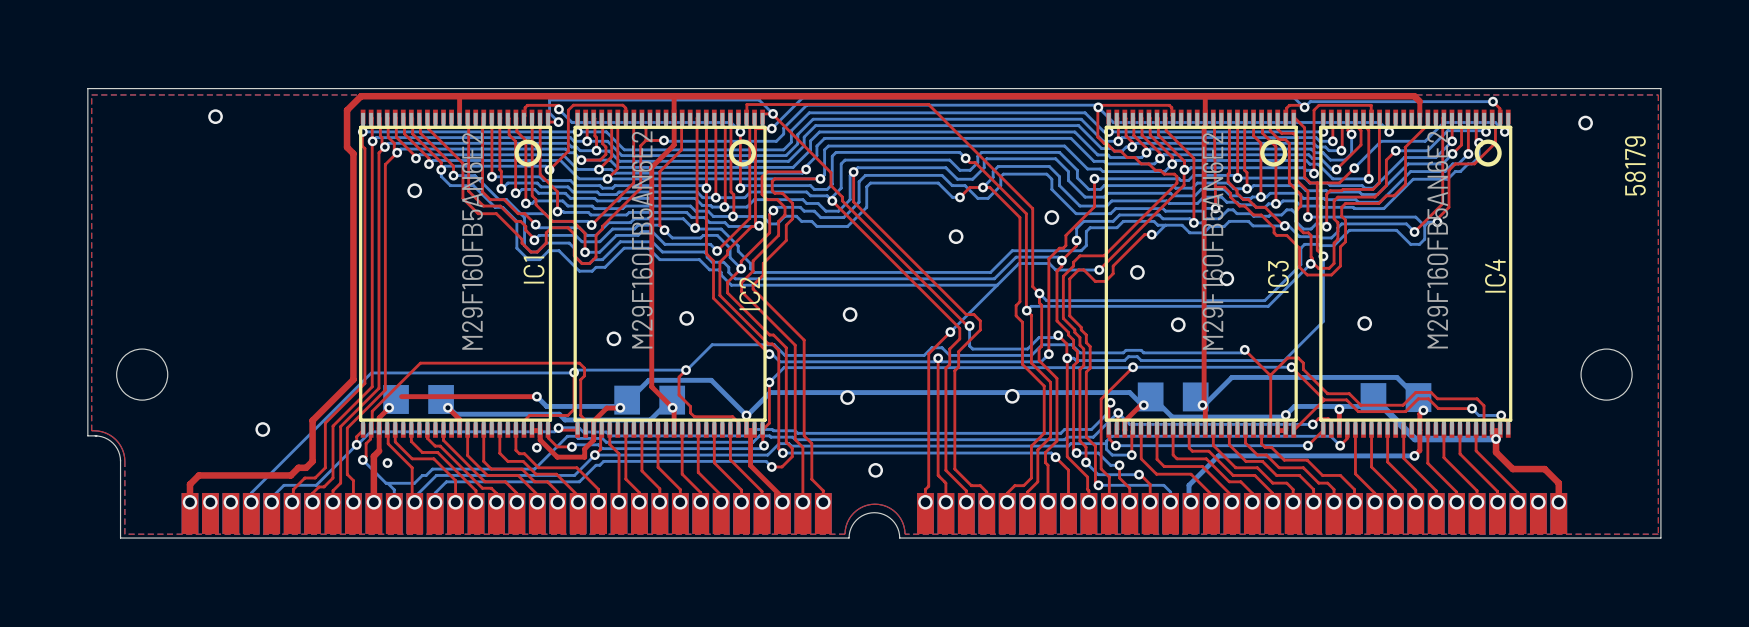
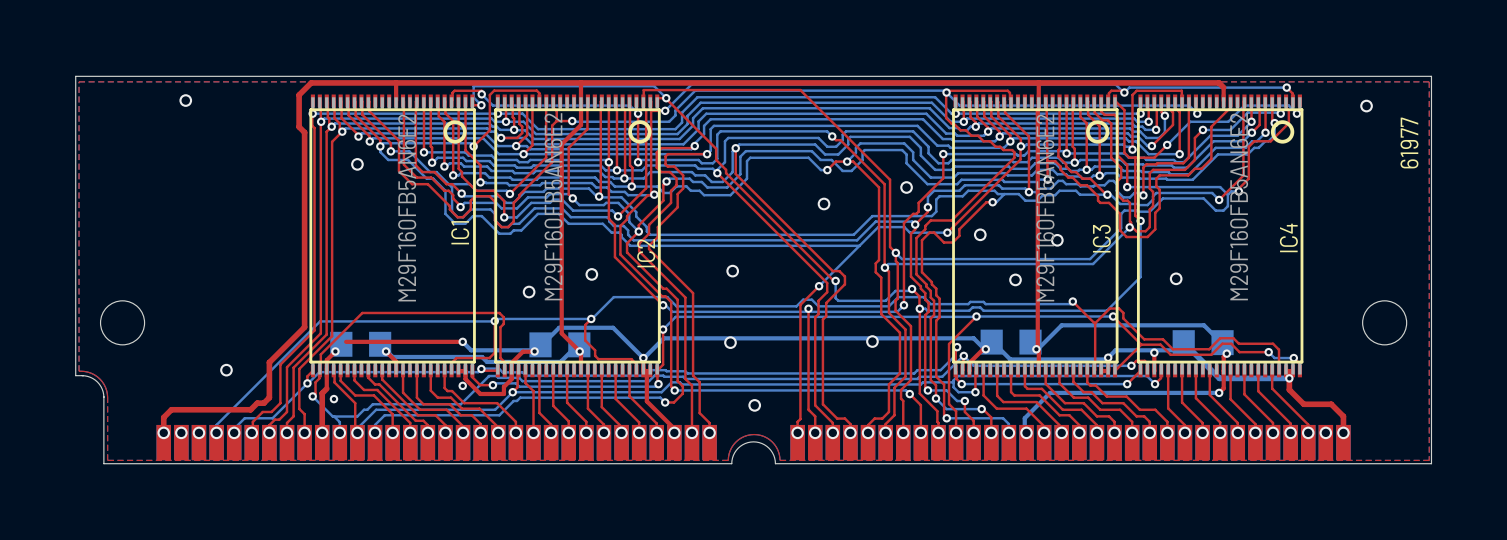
text: 58179 (1635, 165) -> 61977 (1409, 143)

